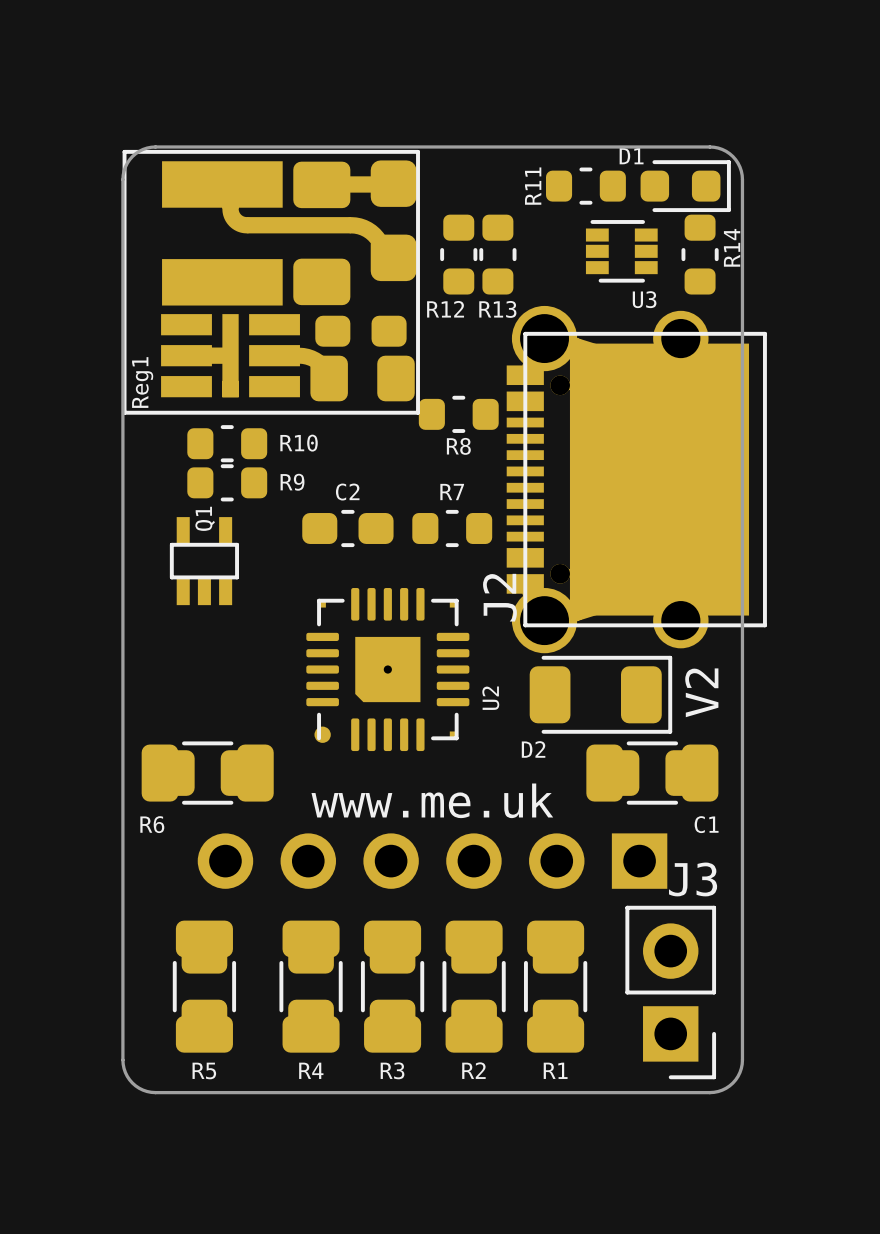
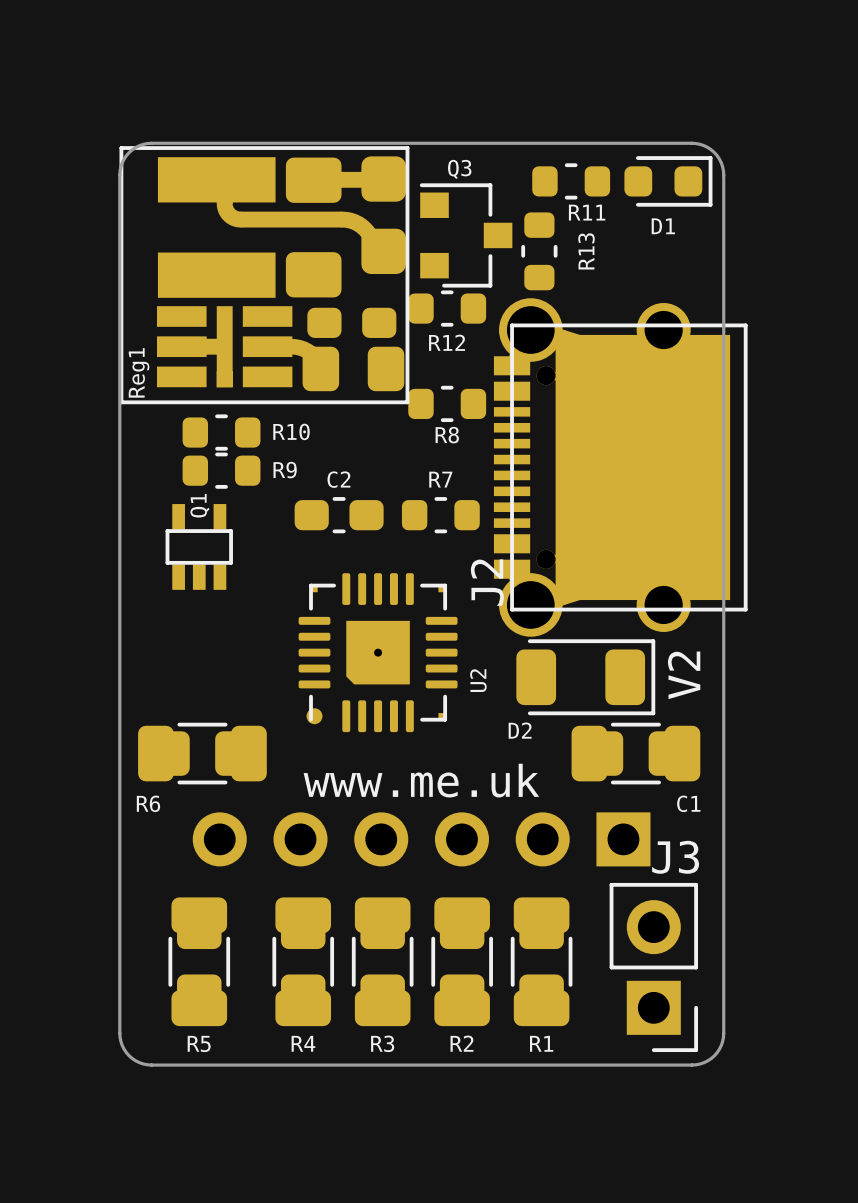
D1 name position: D1 (631, 156) -> D1 (663, 226)
R11 name rotation: 0° (533, 186) -> 90° clockwise (587, 212)
R11 name position: R11 (533, 186) -> R11 (587, 212)
Q3: none -> (466, 235)
U3: (621, 251) -> none
R13 position: (458, 254) -> (539, 251)
R12 rotation: 0° (497, 254) -> 90° clockwise (447, 308)
R12 position: (497, 254) -> (447, 308)
R14: (700, 254) -> none
R13 name rotation: 0° (497, 309) -> 90° counterclockwise (586, 251)

